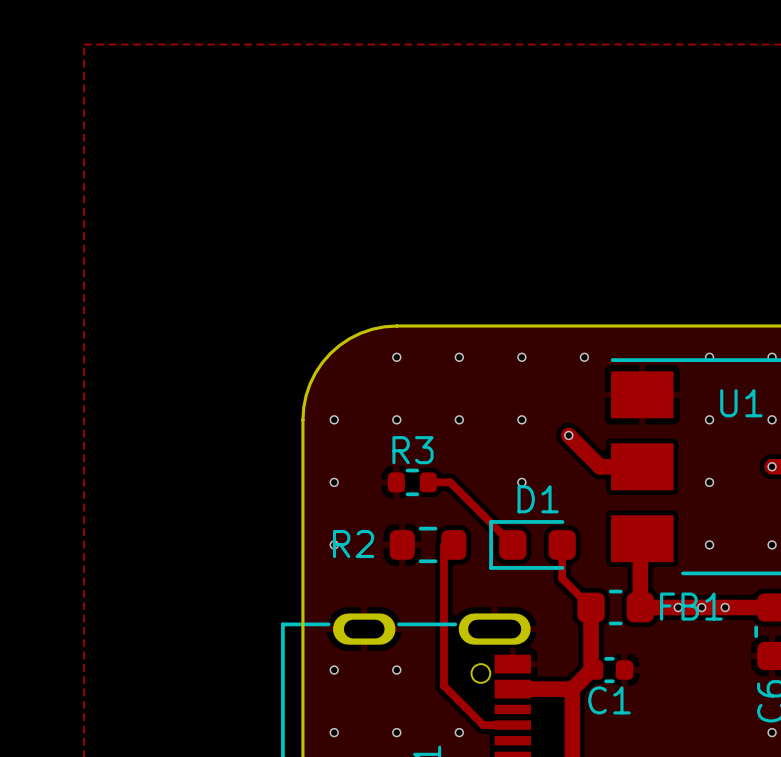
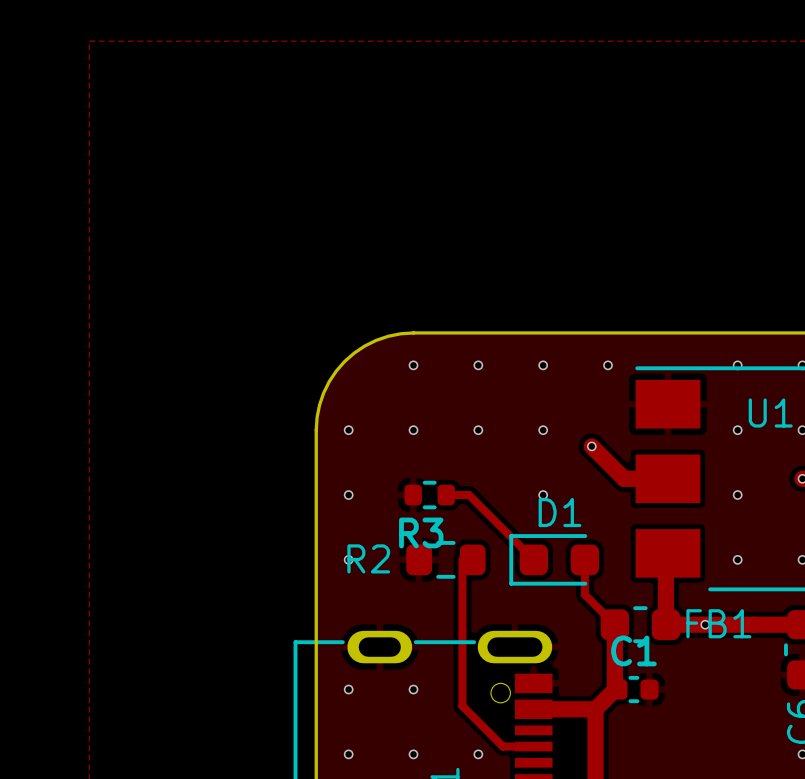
R3 name position: R3 (413, 450) -> R3 (421, 532)
via: (701, 607) -> none
via: (725, 607) -> none
C1 name position: C1 (609, 700) -> C1 (633, 650)

